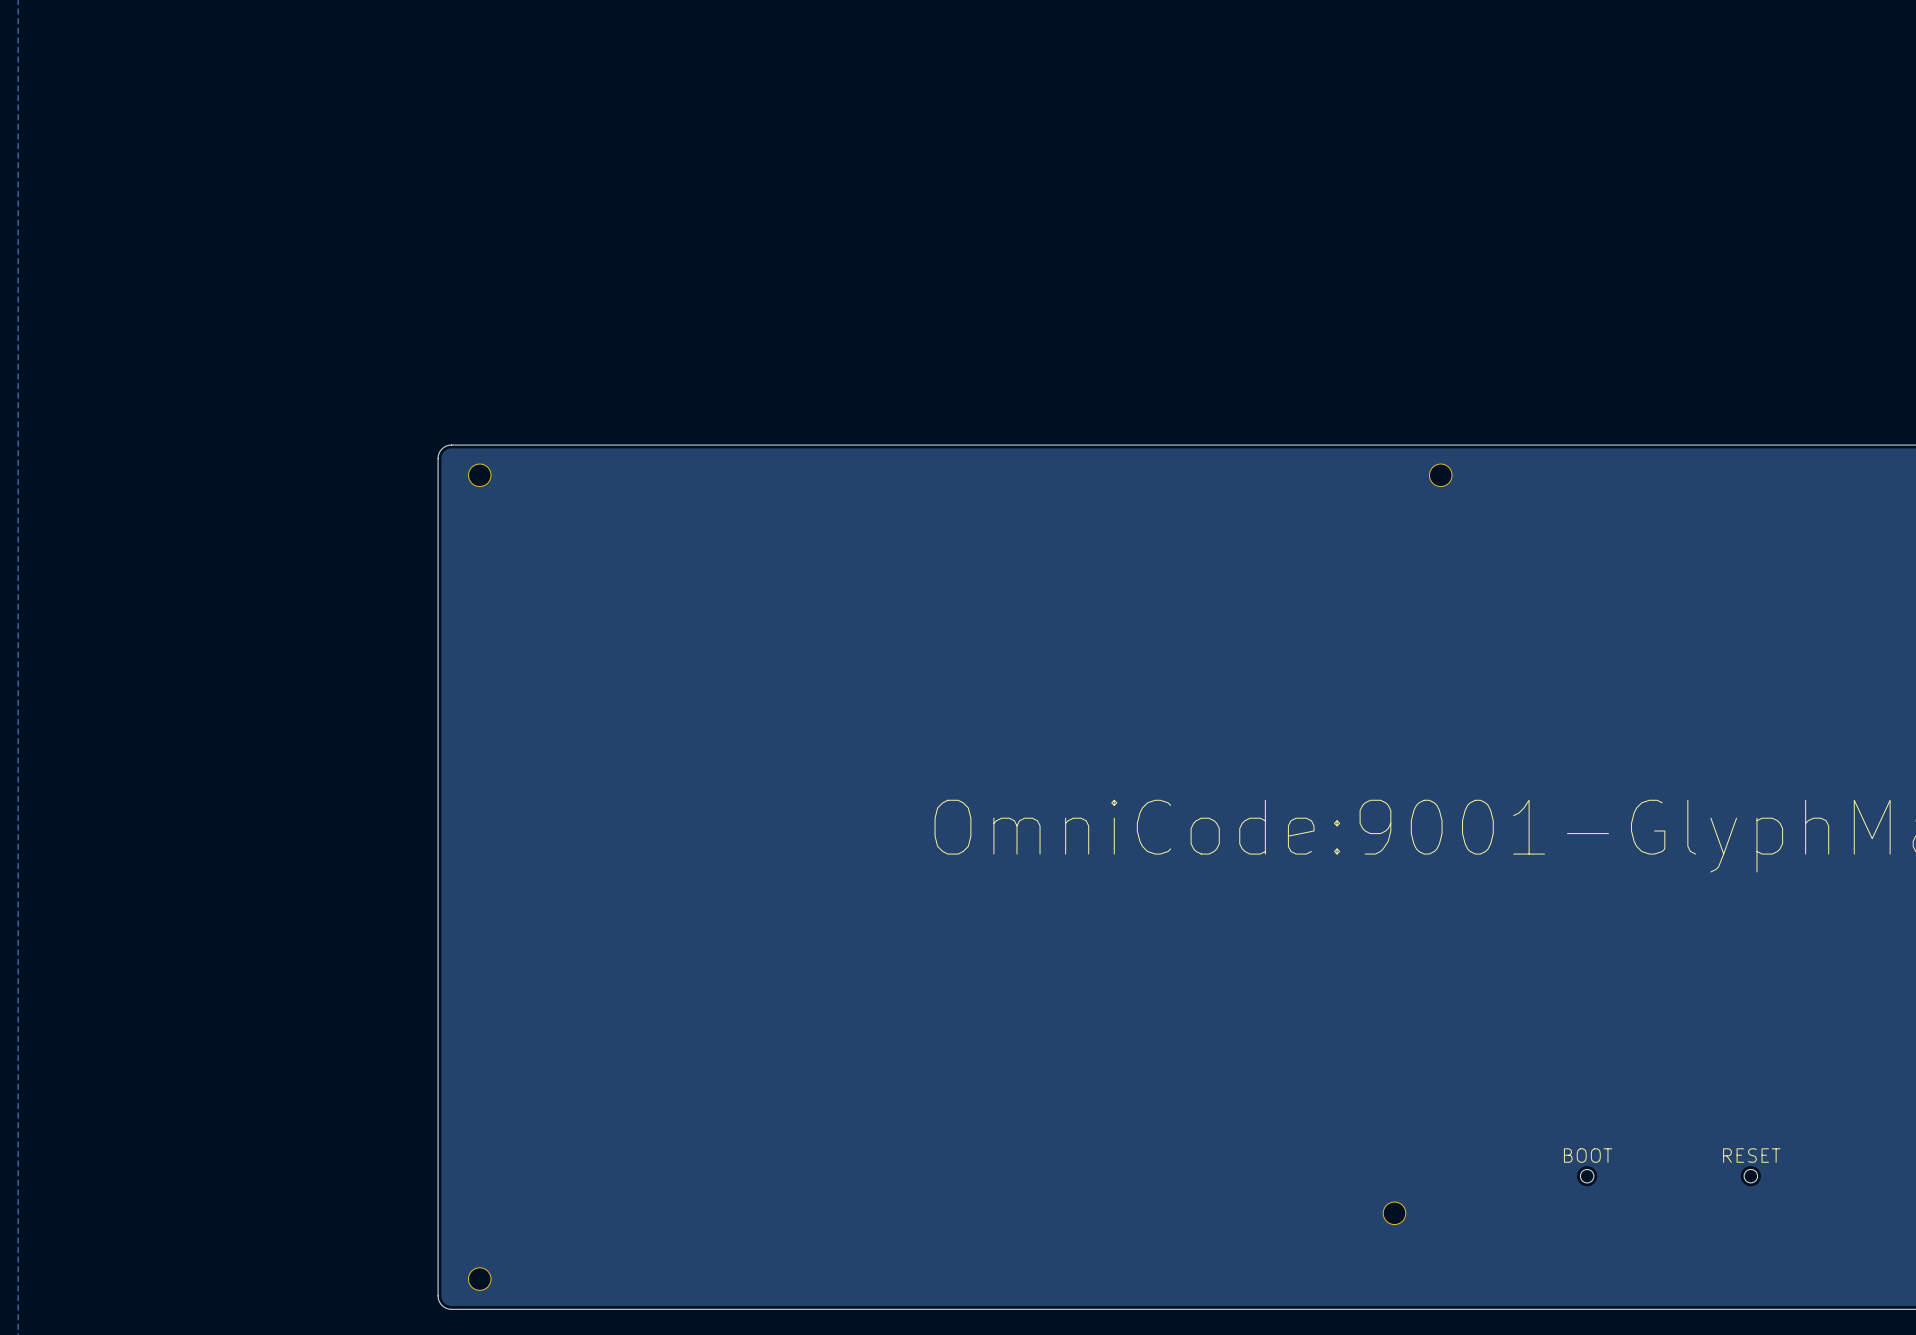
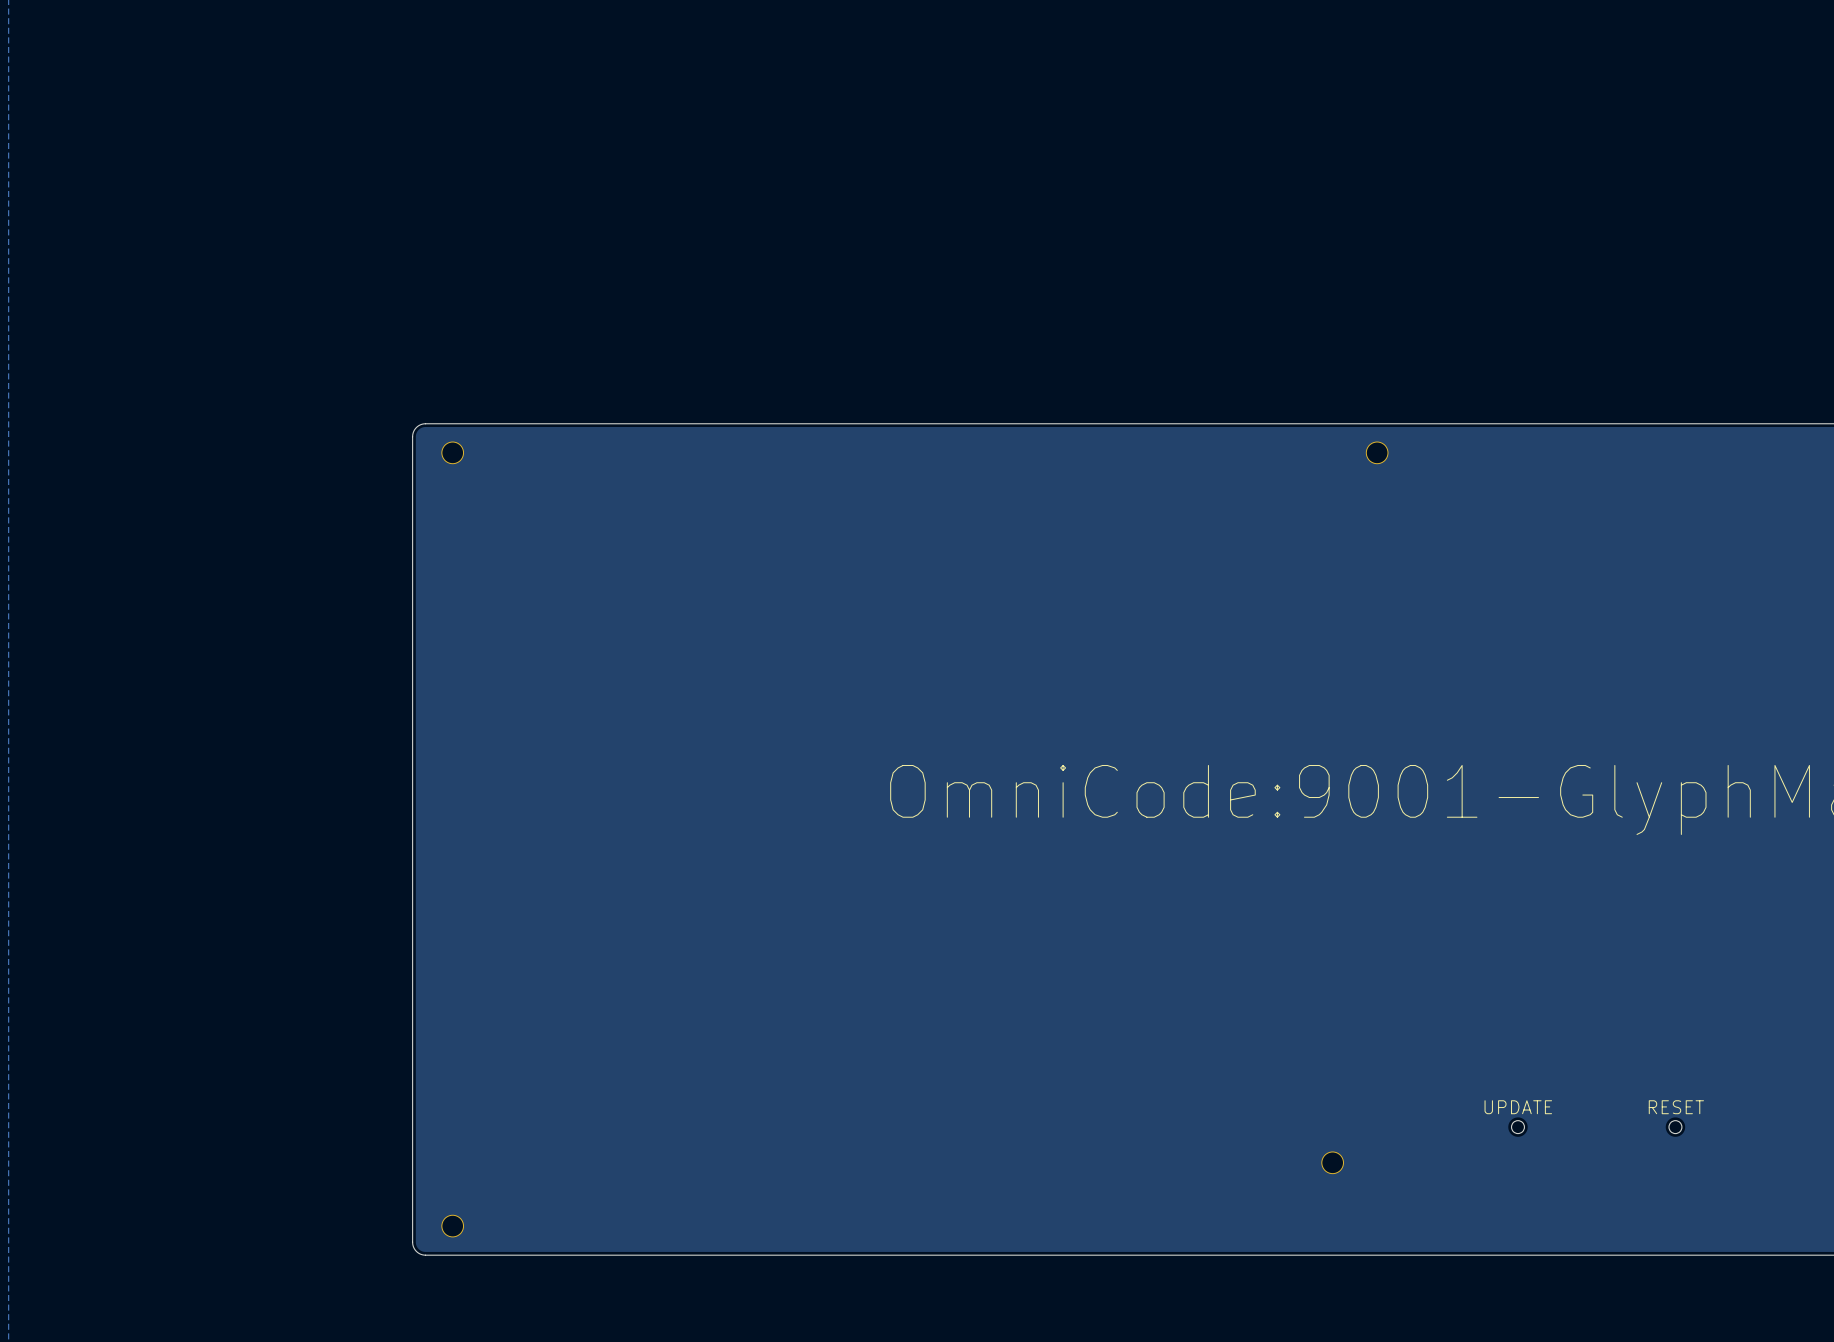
text: BOOT (1588, 1155) -> UPDATE (1518, 1107)

